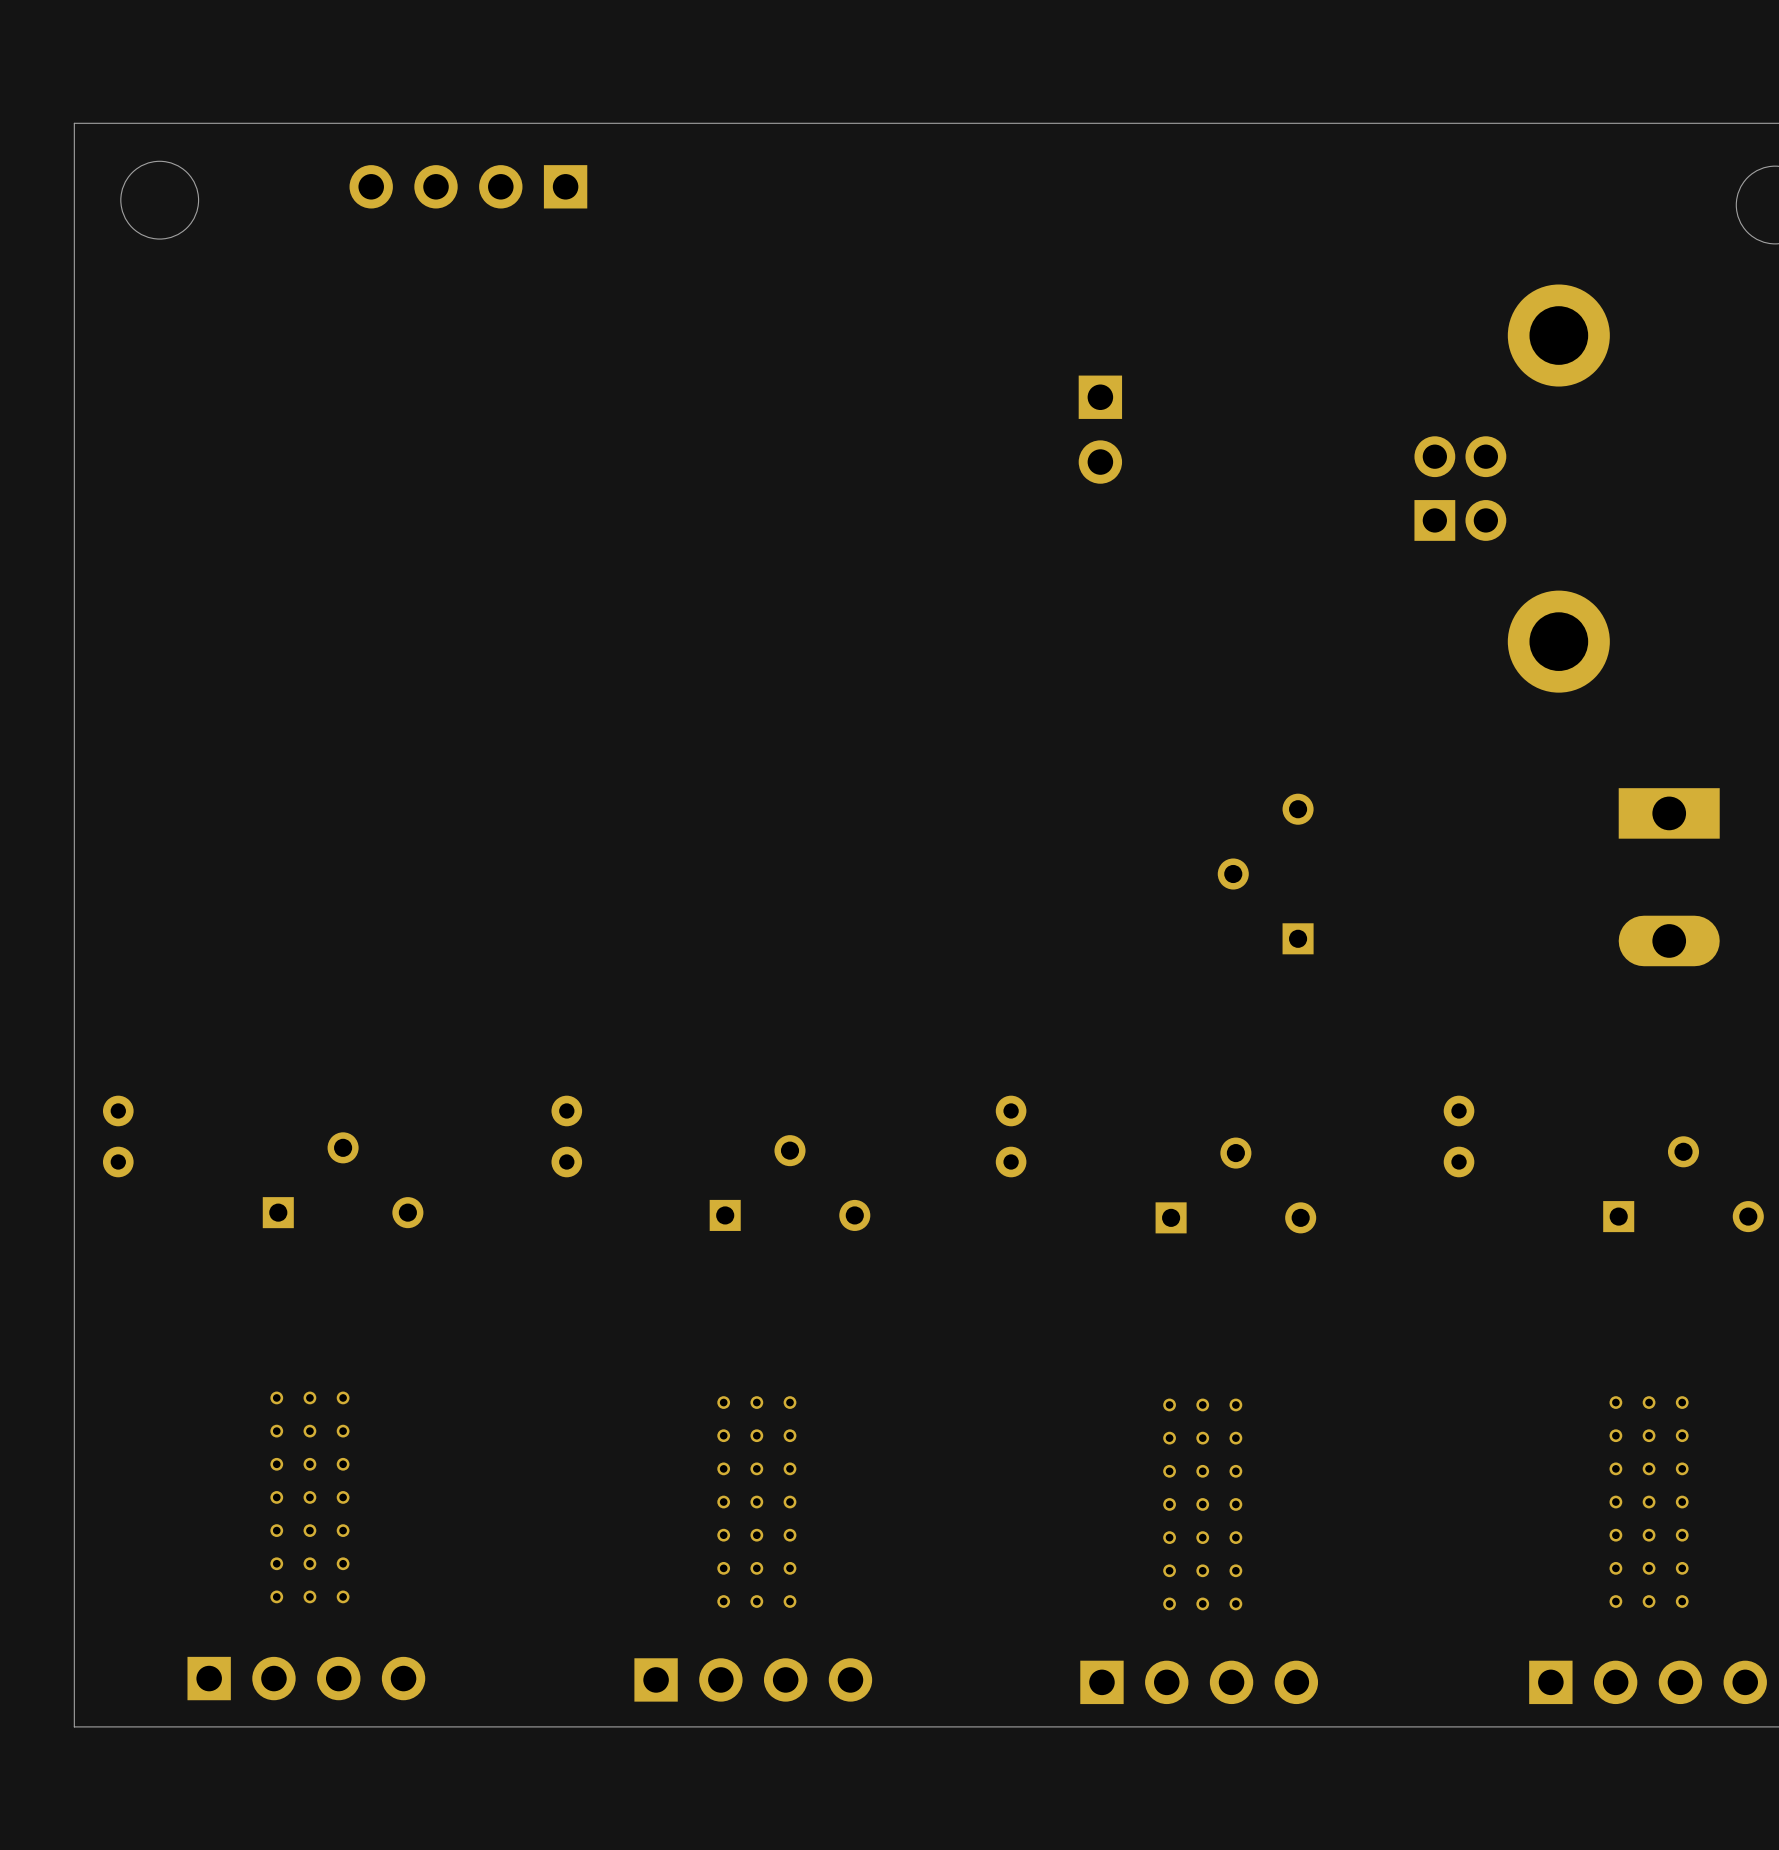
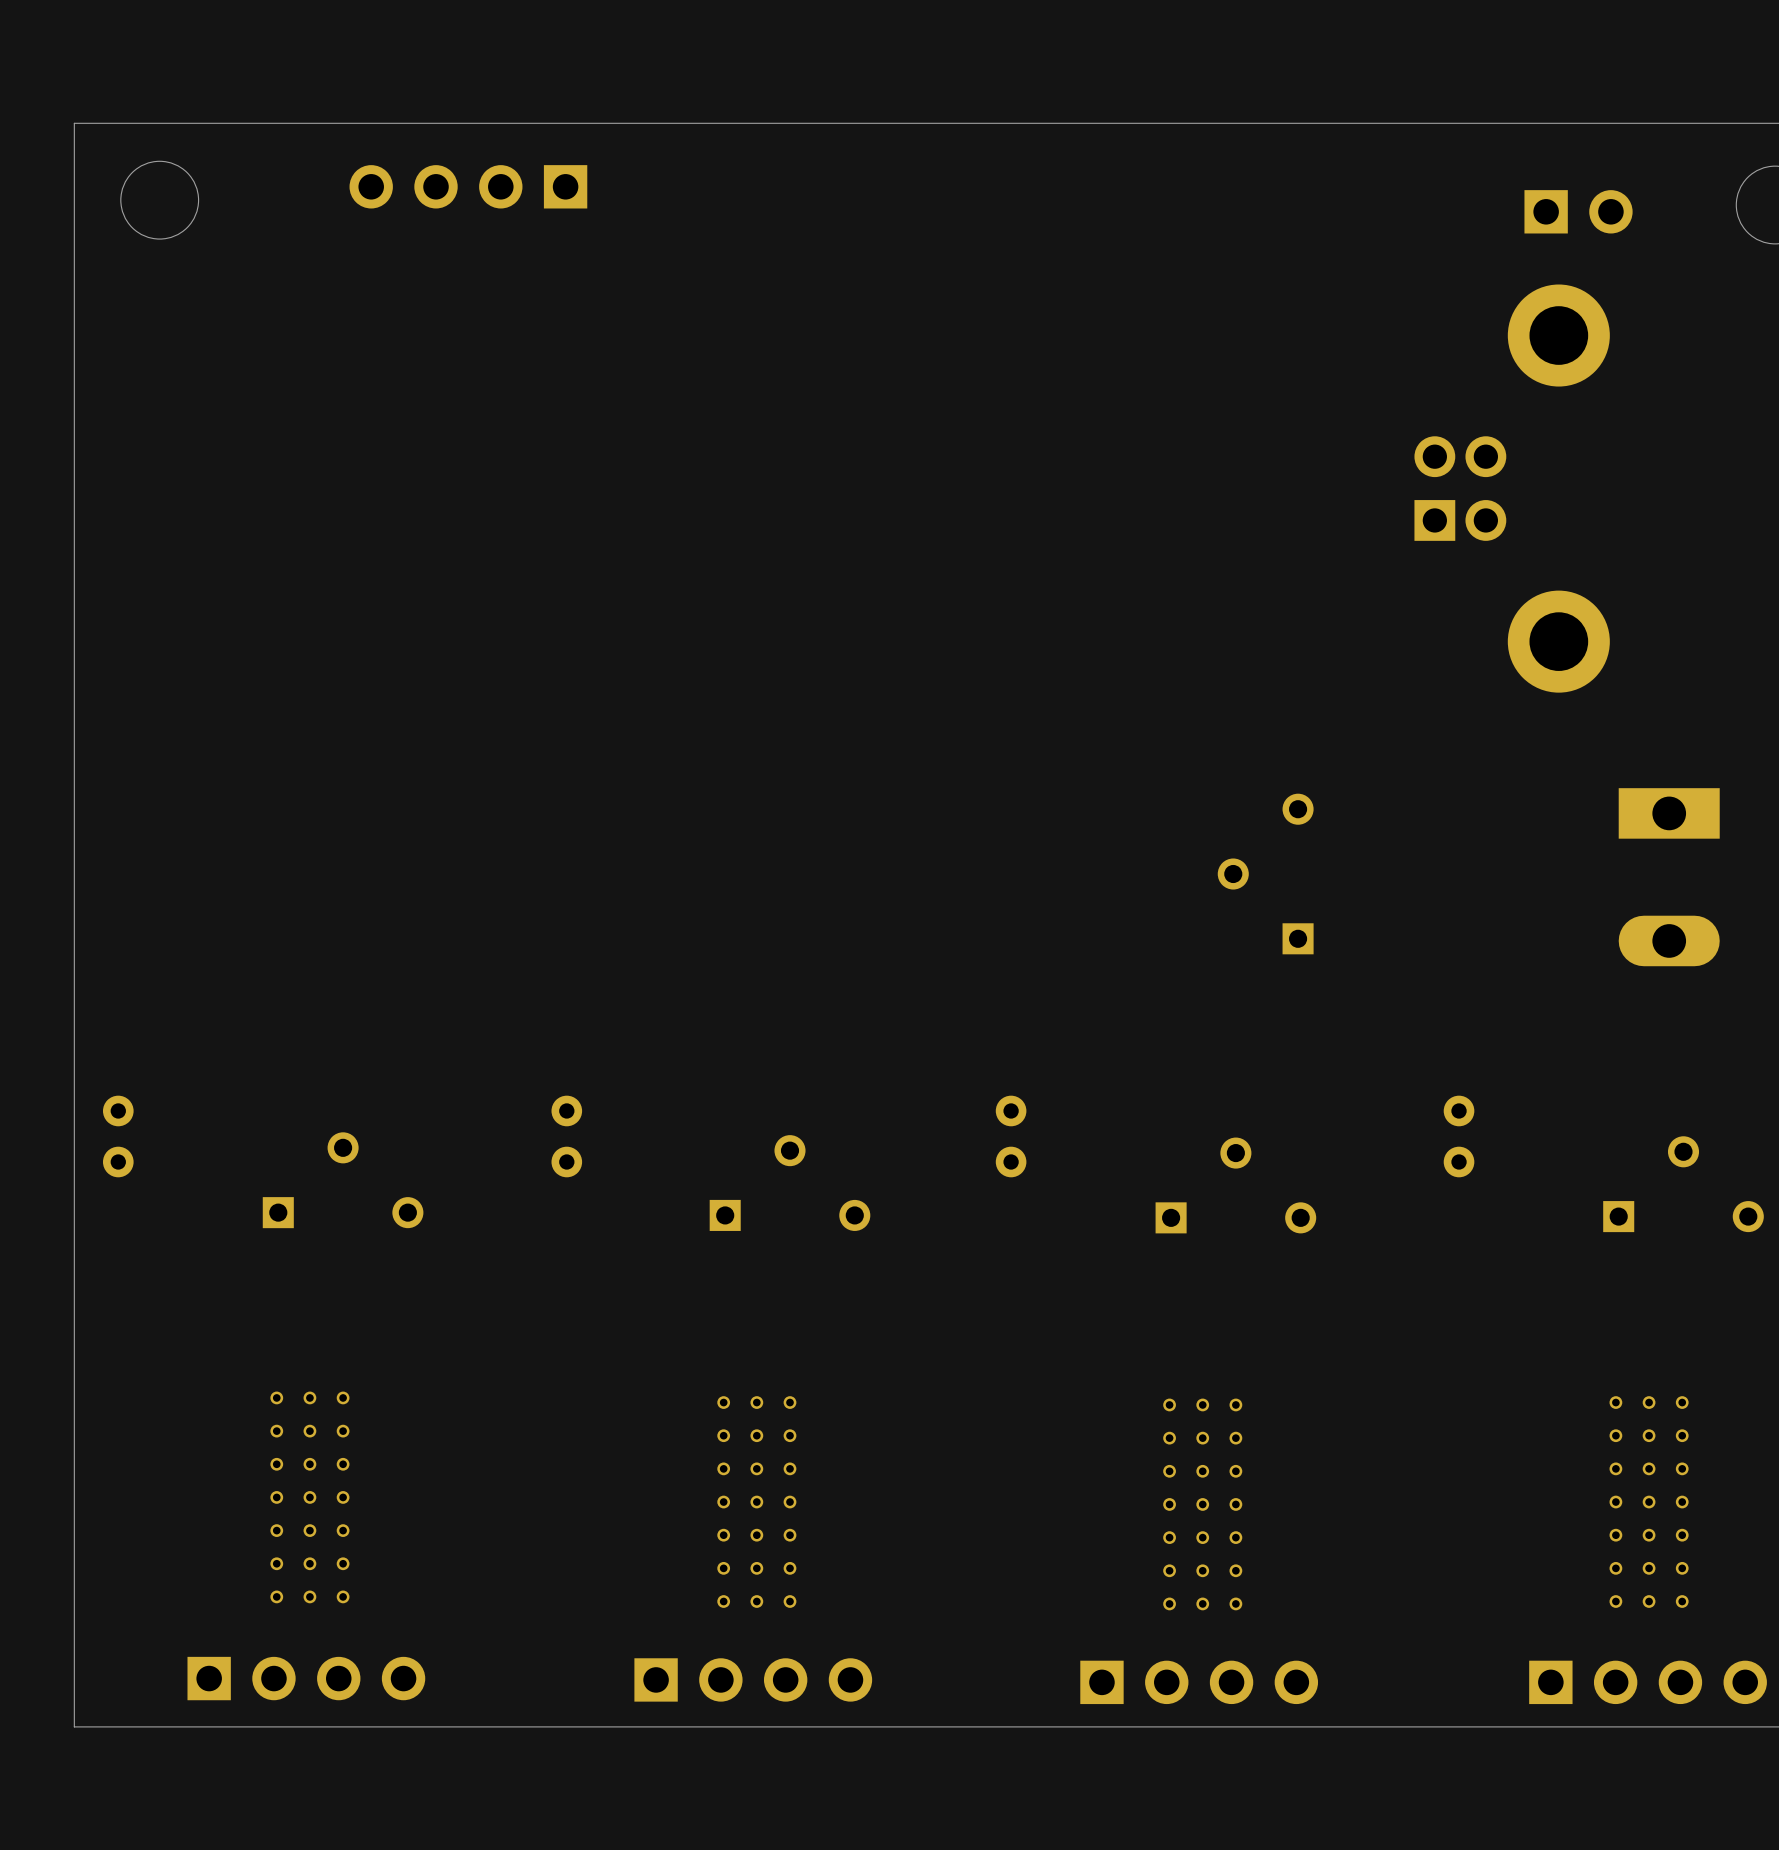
part rotation: 0° (1100, 429) -> 90° counterclockwise (1578, 211)
part position: (1100, 429) -> (1578, 211)

